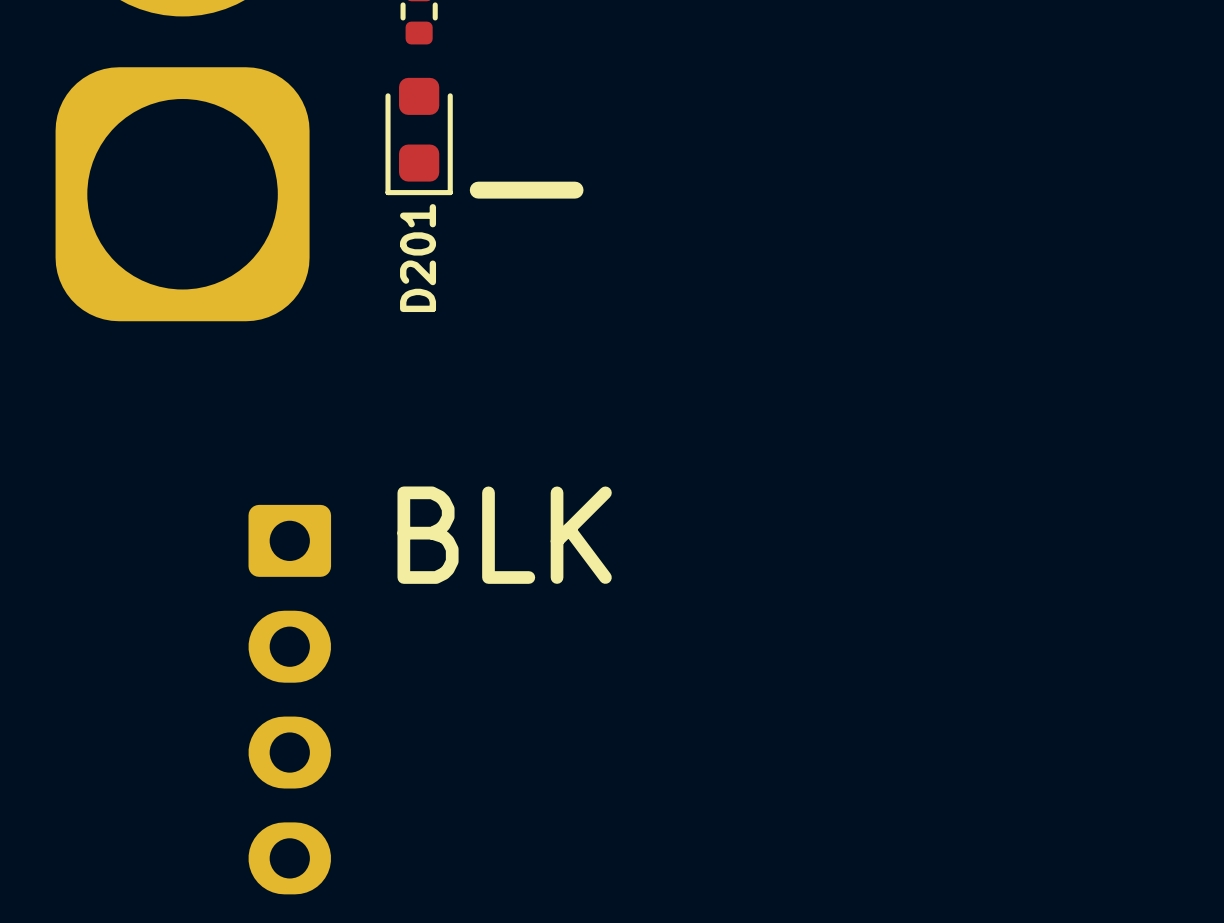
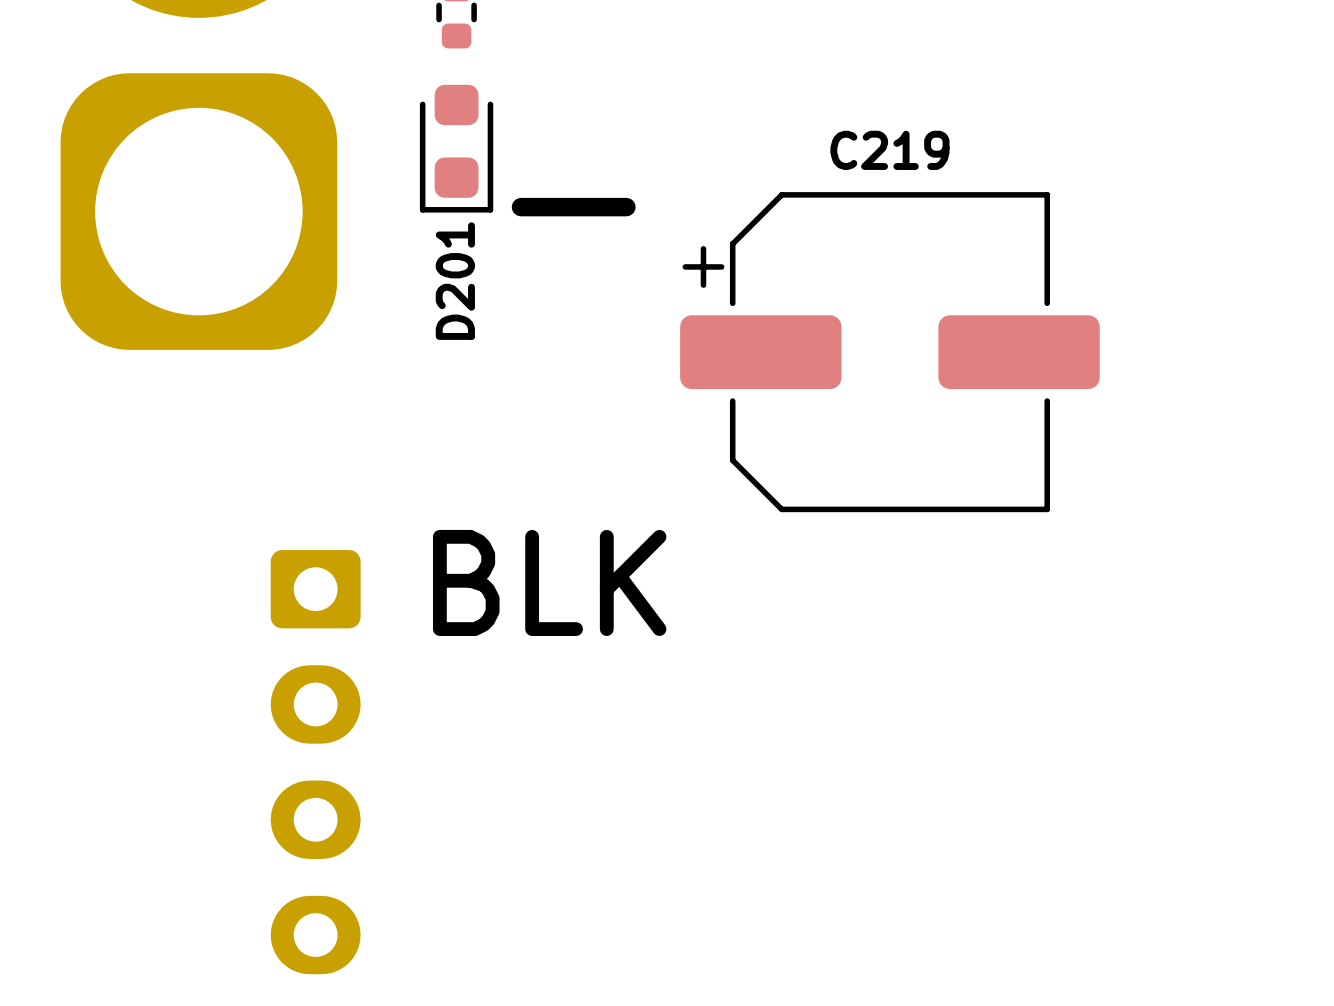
C219: none -> (889, 352)

